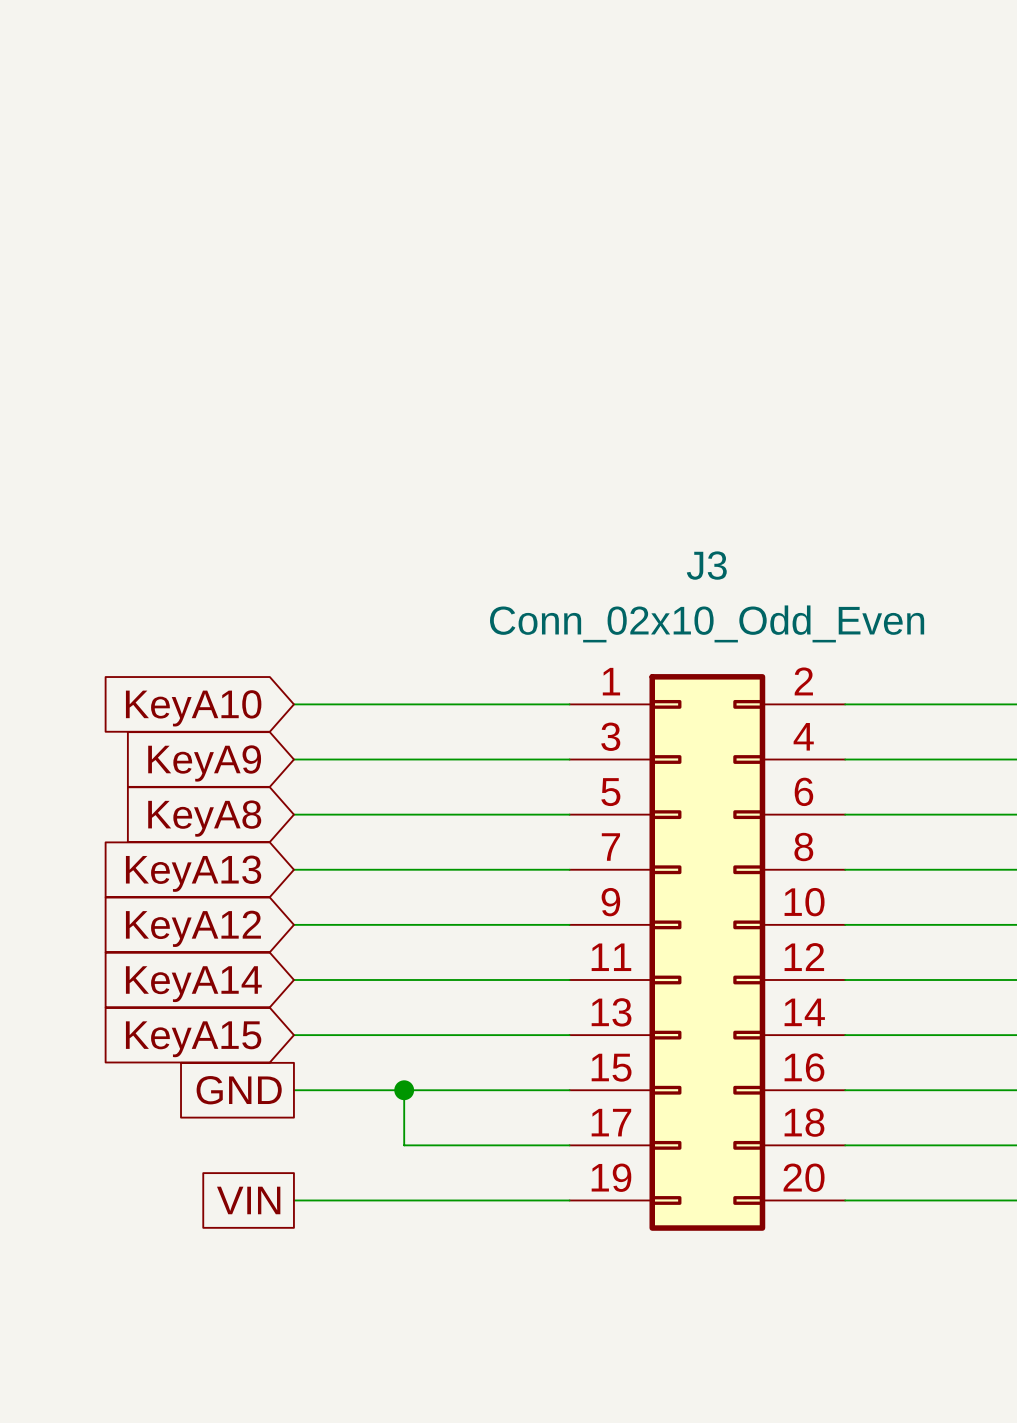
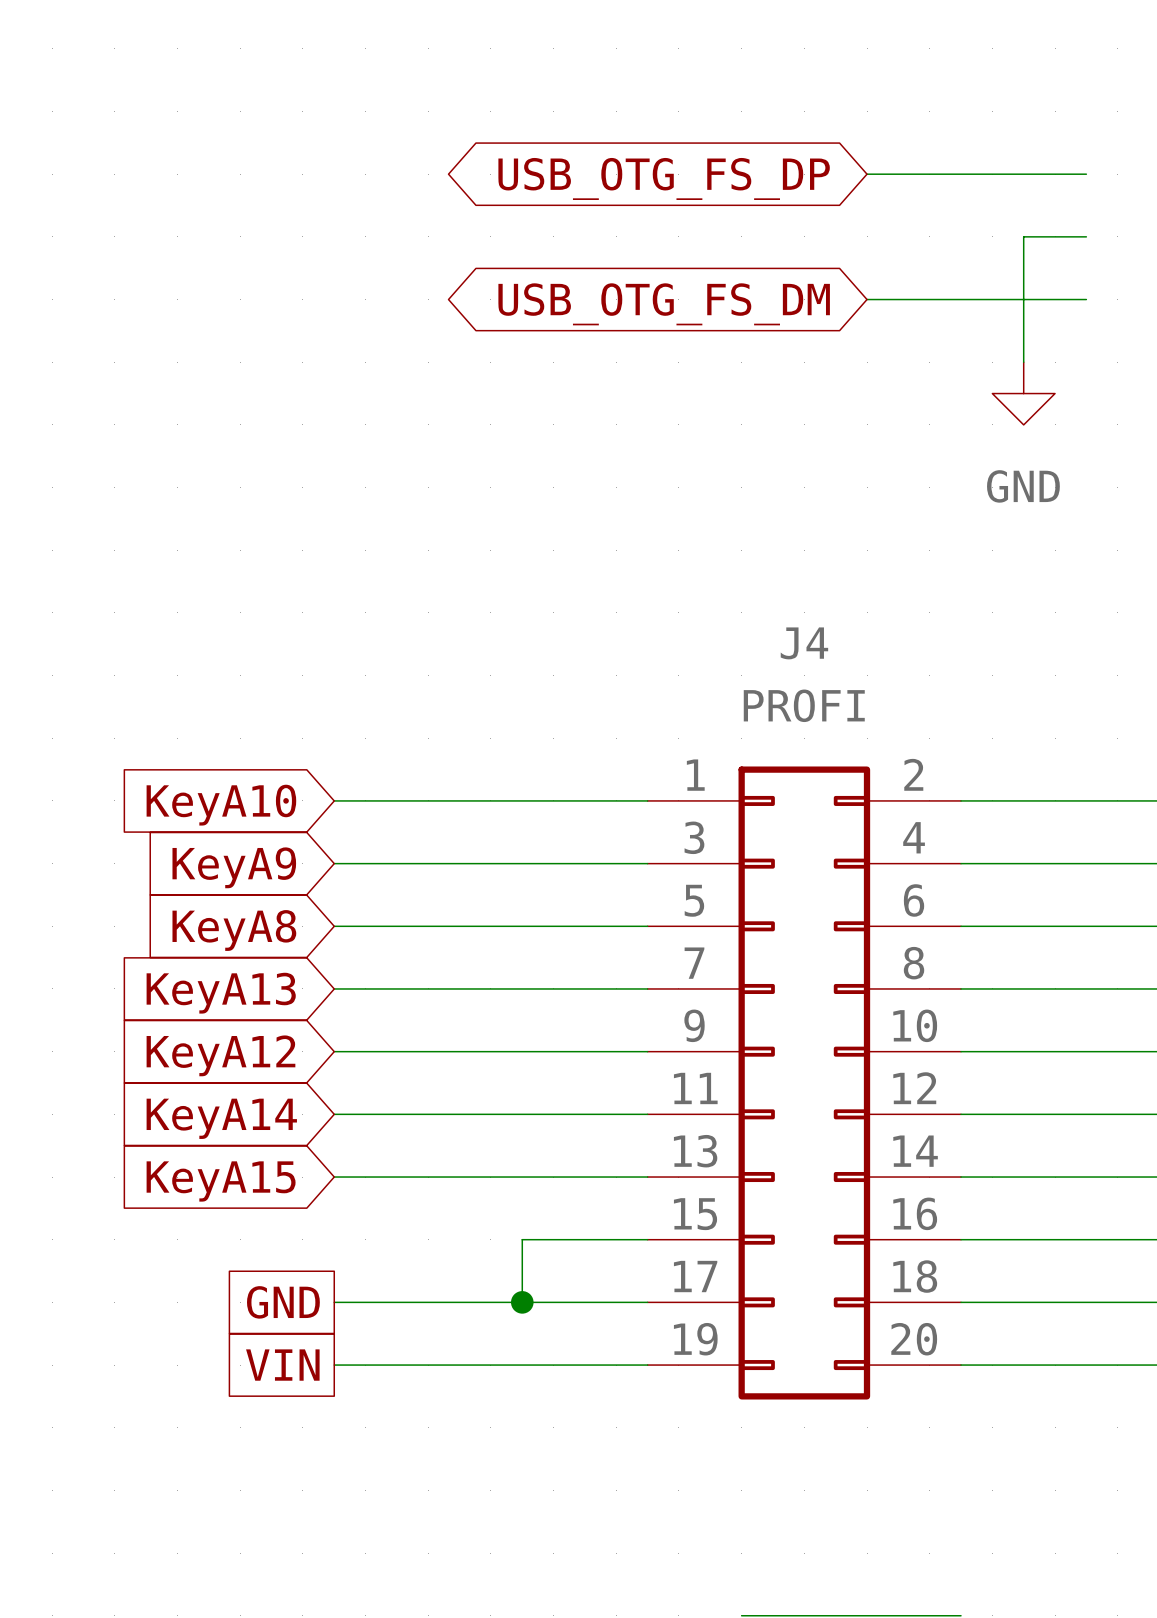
wire: none -> (867, 174) (1086, 174)
global label: none -> USB_OTG_FS_DP (664, 178)
wire: none -> (1086, 236) (1023, 236) (1023, 362)
wire: none -> (867, 299) (1086, 299)
global label: none -> USB_OTG_FS_DM (664, 304)
power symbol: none -> GND (1023, 393)
J3 name: J3 (706, 565) -> J4 (804, 643)
J3 value: Conn_02x10_Odd_Even (707, 623) -> PROFI (804, 705)
global label position: GND (239, 1090) -> GND (283, 1302)
wire: (293, 1090) (459, 1090) -> (522, 1302) (522, 1239)
wire: (404, 1090) (404, 1145) -> (334, 1302) (459, 1302)
junction position: (404, 1090) -> (522, 1302)
wire: none -> (741, 1615) (961, 1615)

